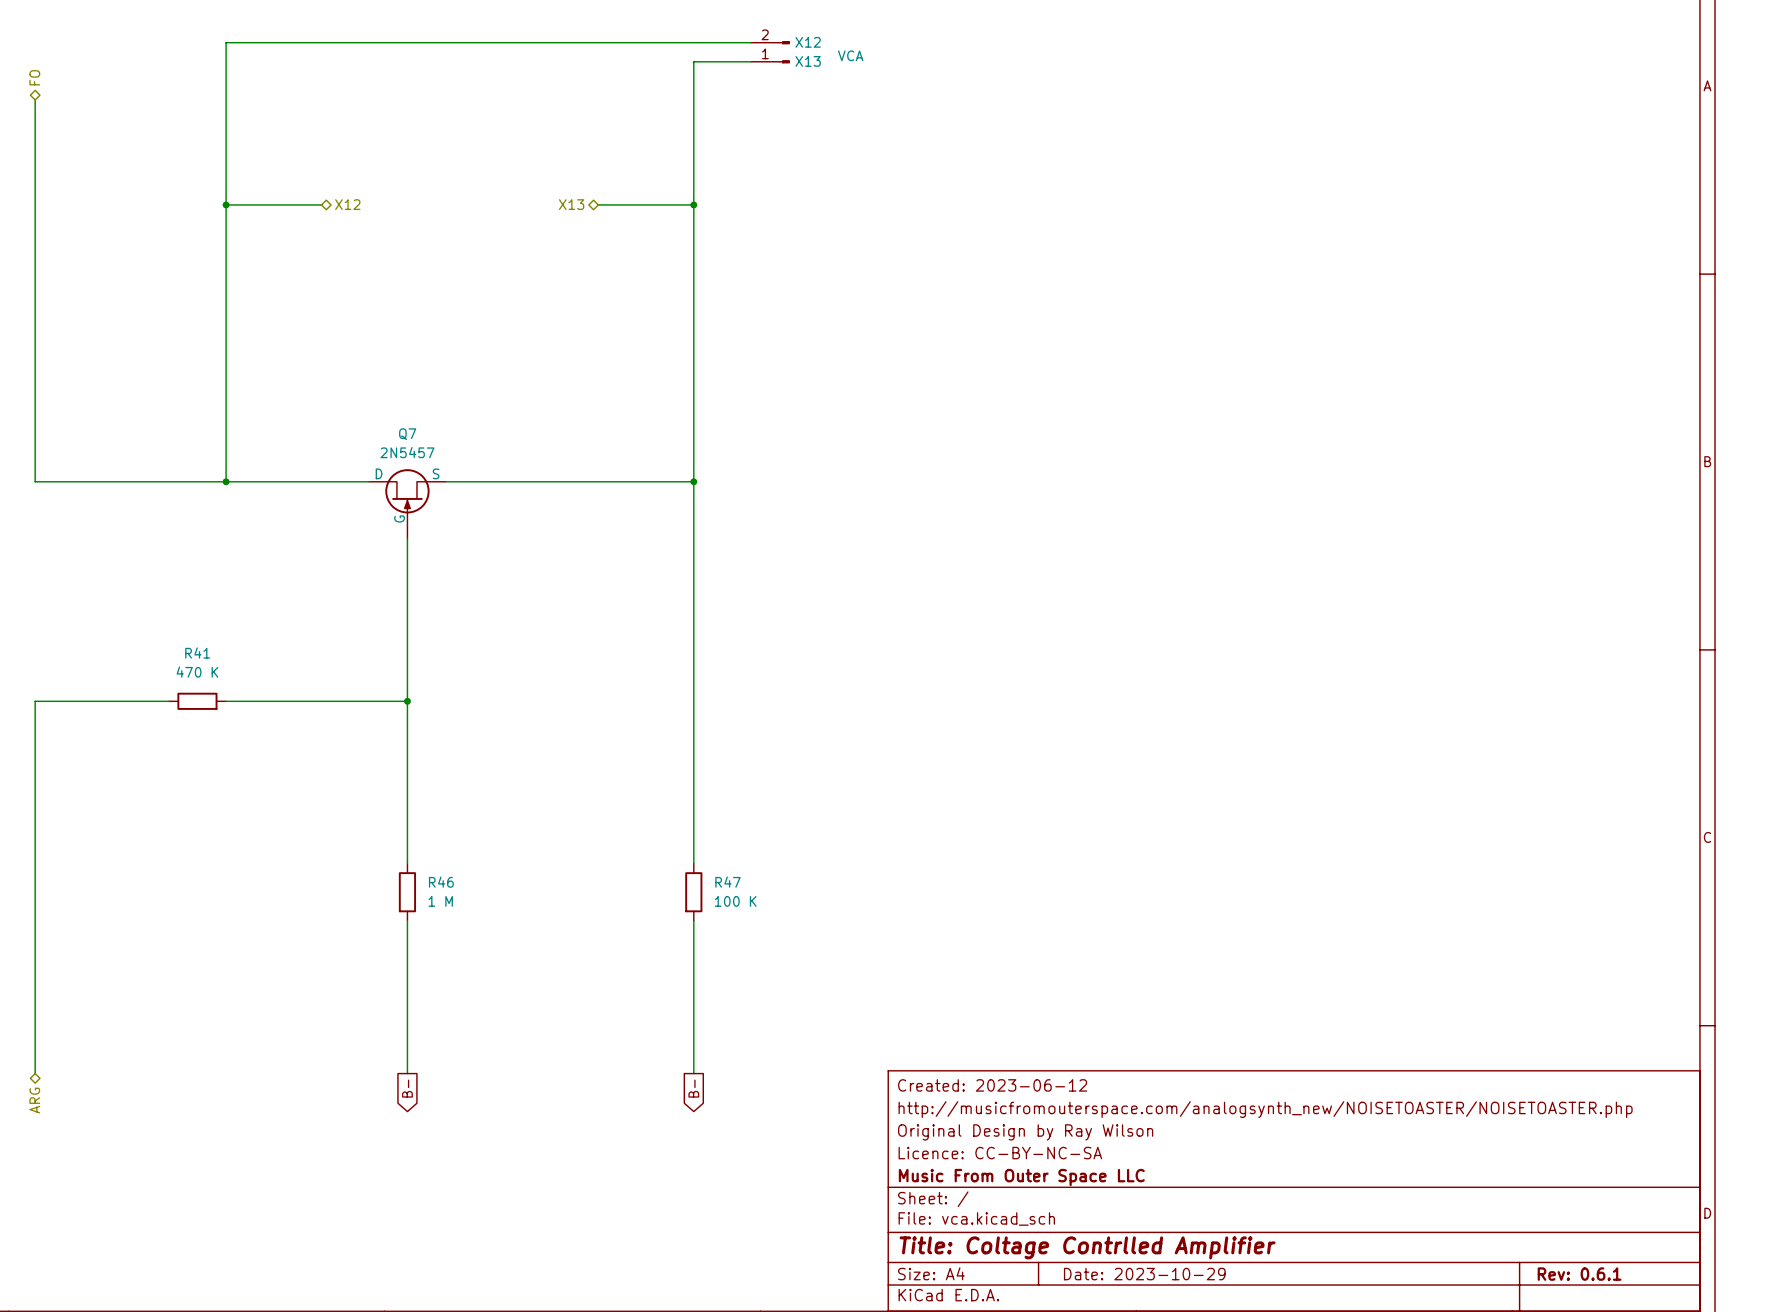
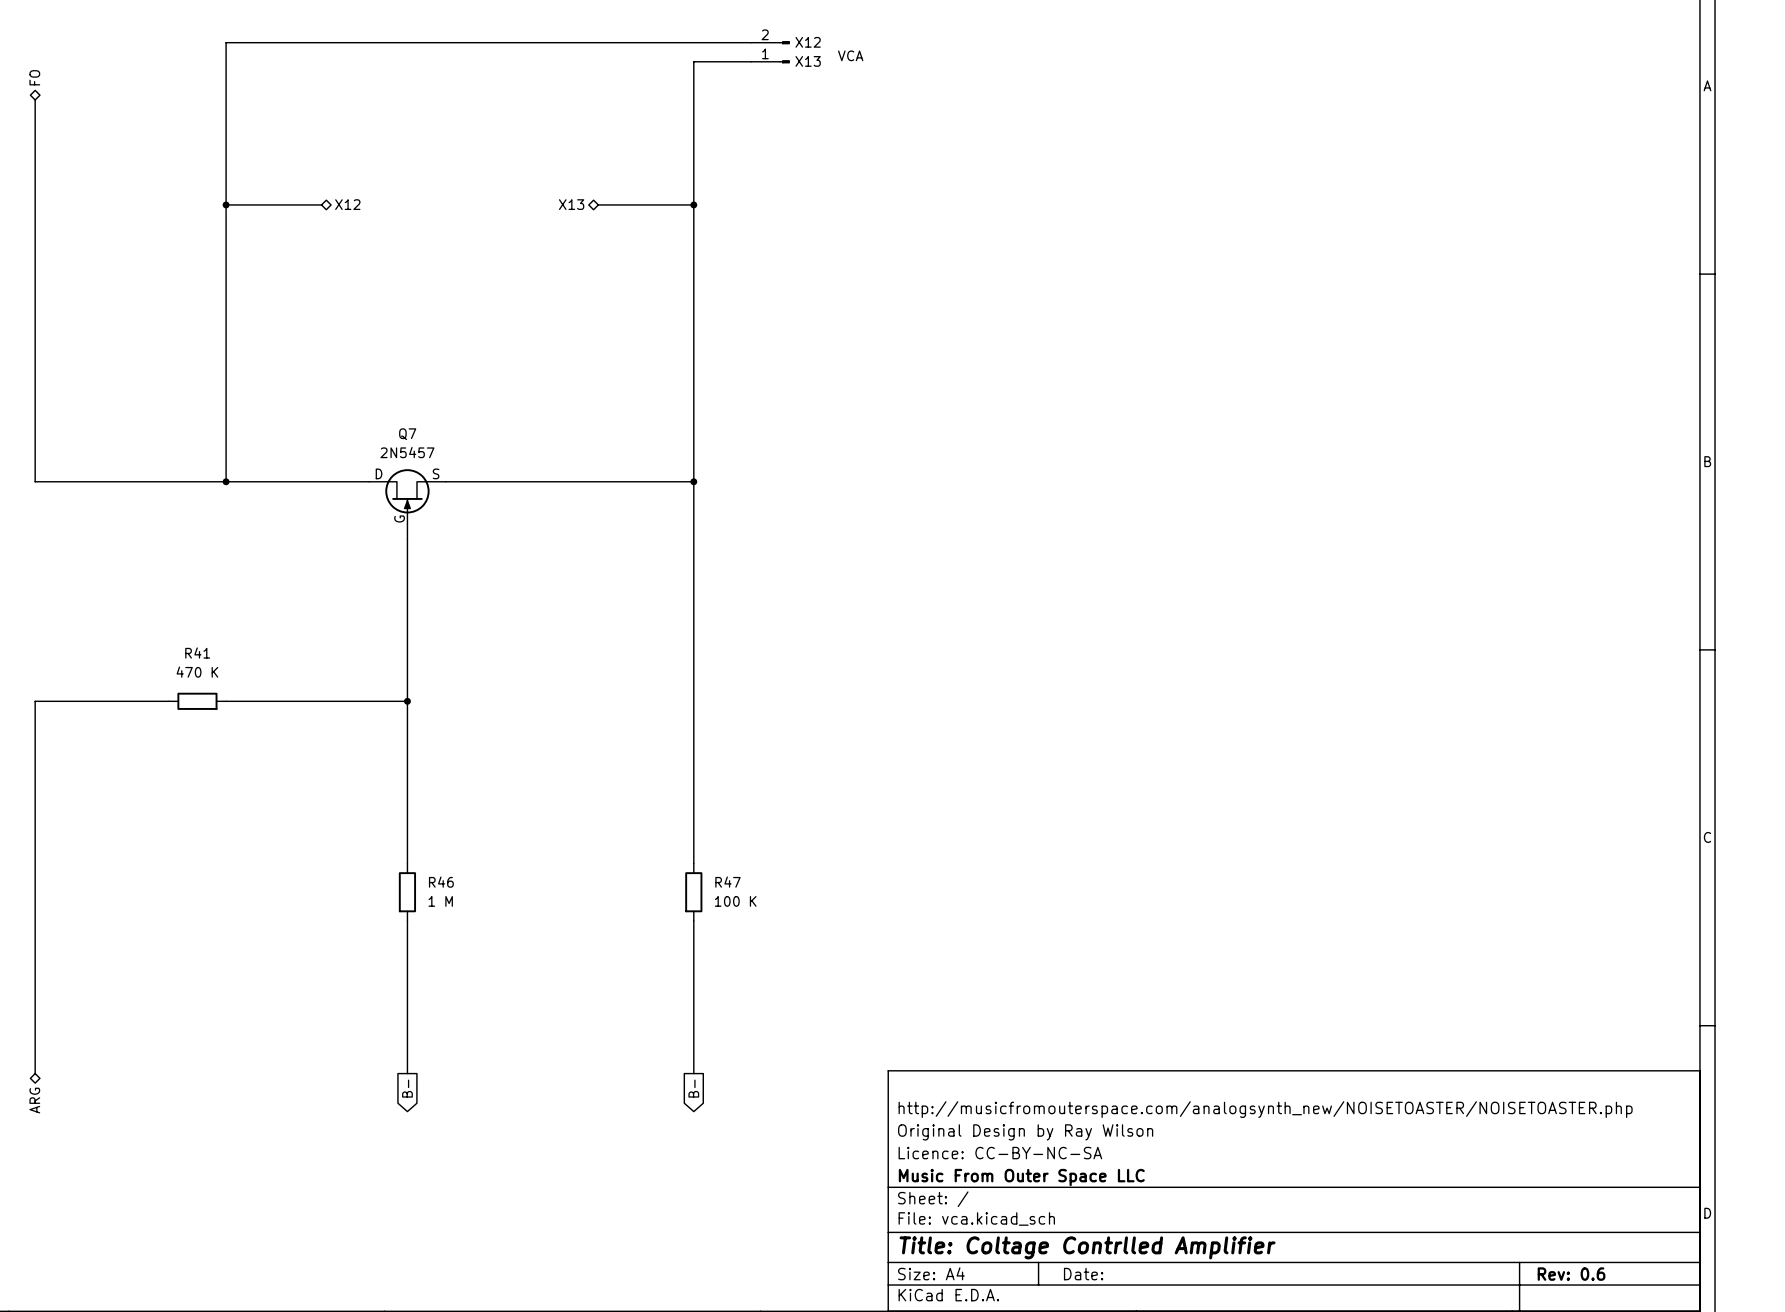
title block: Created: 2023-06-12 (992, 1085) -> none
title block: Date: 2023-10-29 (1144, 1274) -> Date: (1083, 1274)
title block: Rev: 0.6.1 (1579, 1274) -> Rev: 0.6 (1571, 1274)

